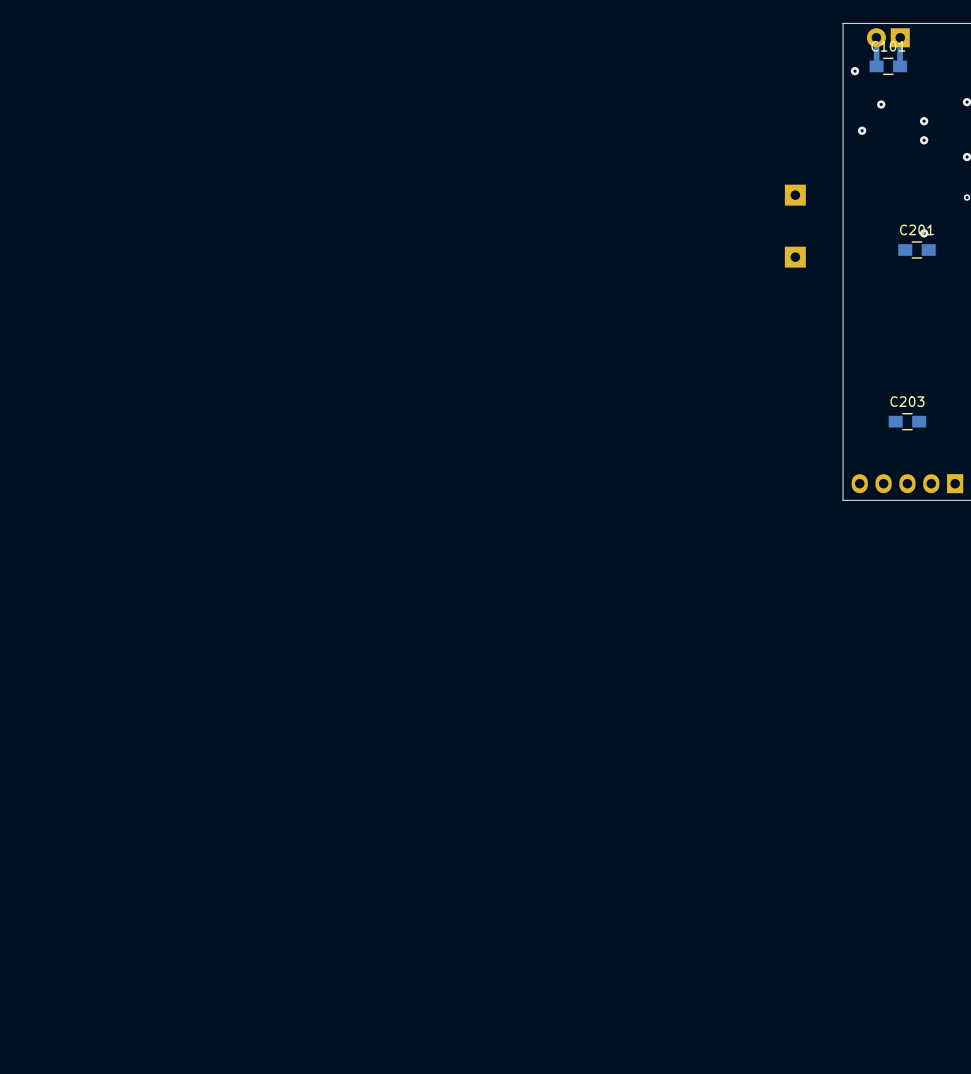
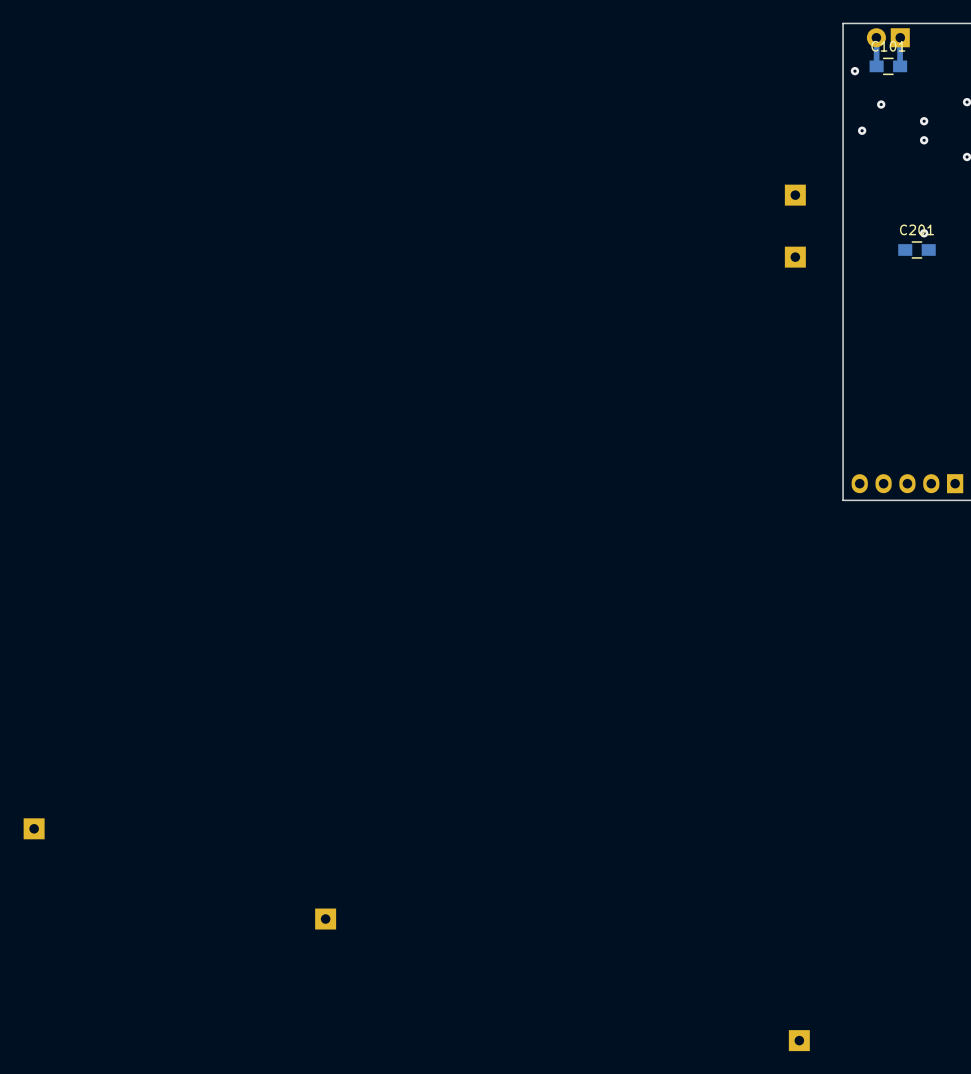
via: (967, 197) -> none
C203: (907, 421) -> none
part: none -> (34, 828)
part: none -> (325, 919)
part: none -> (799, 1040)

